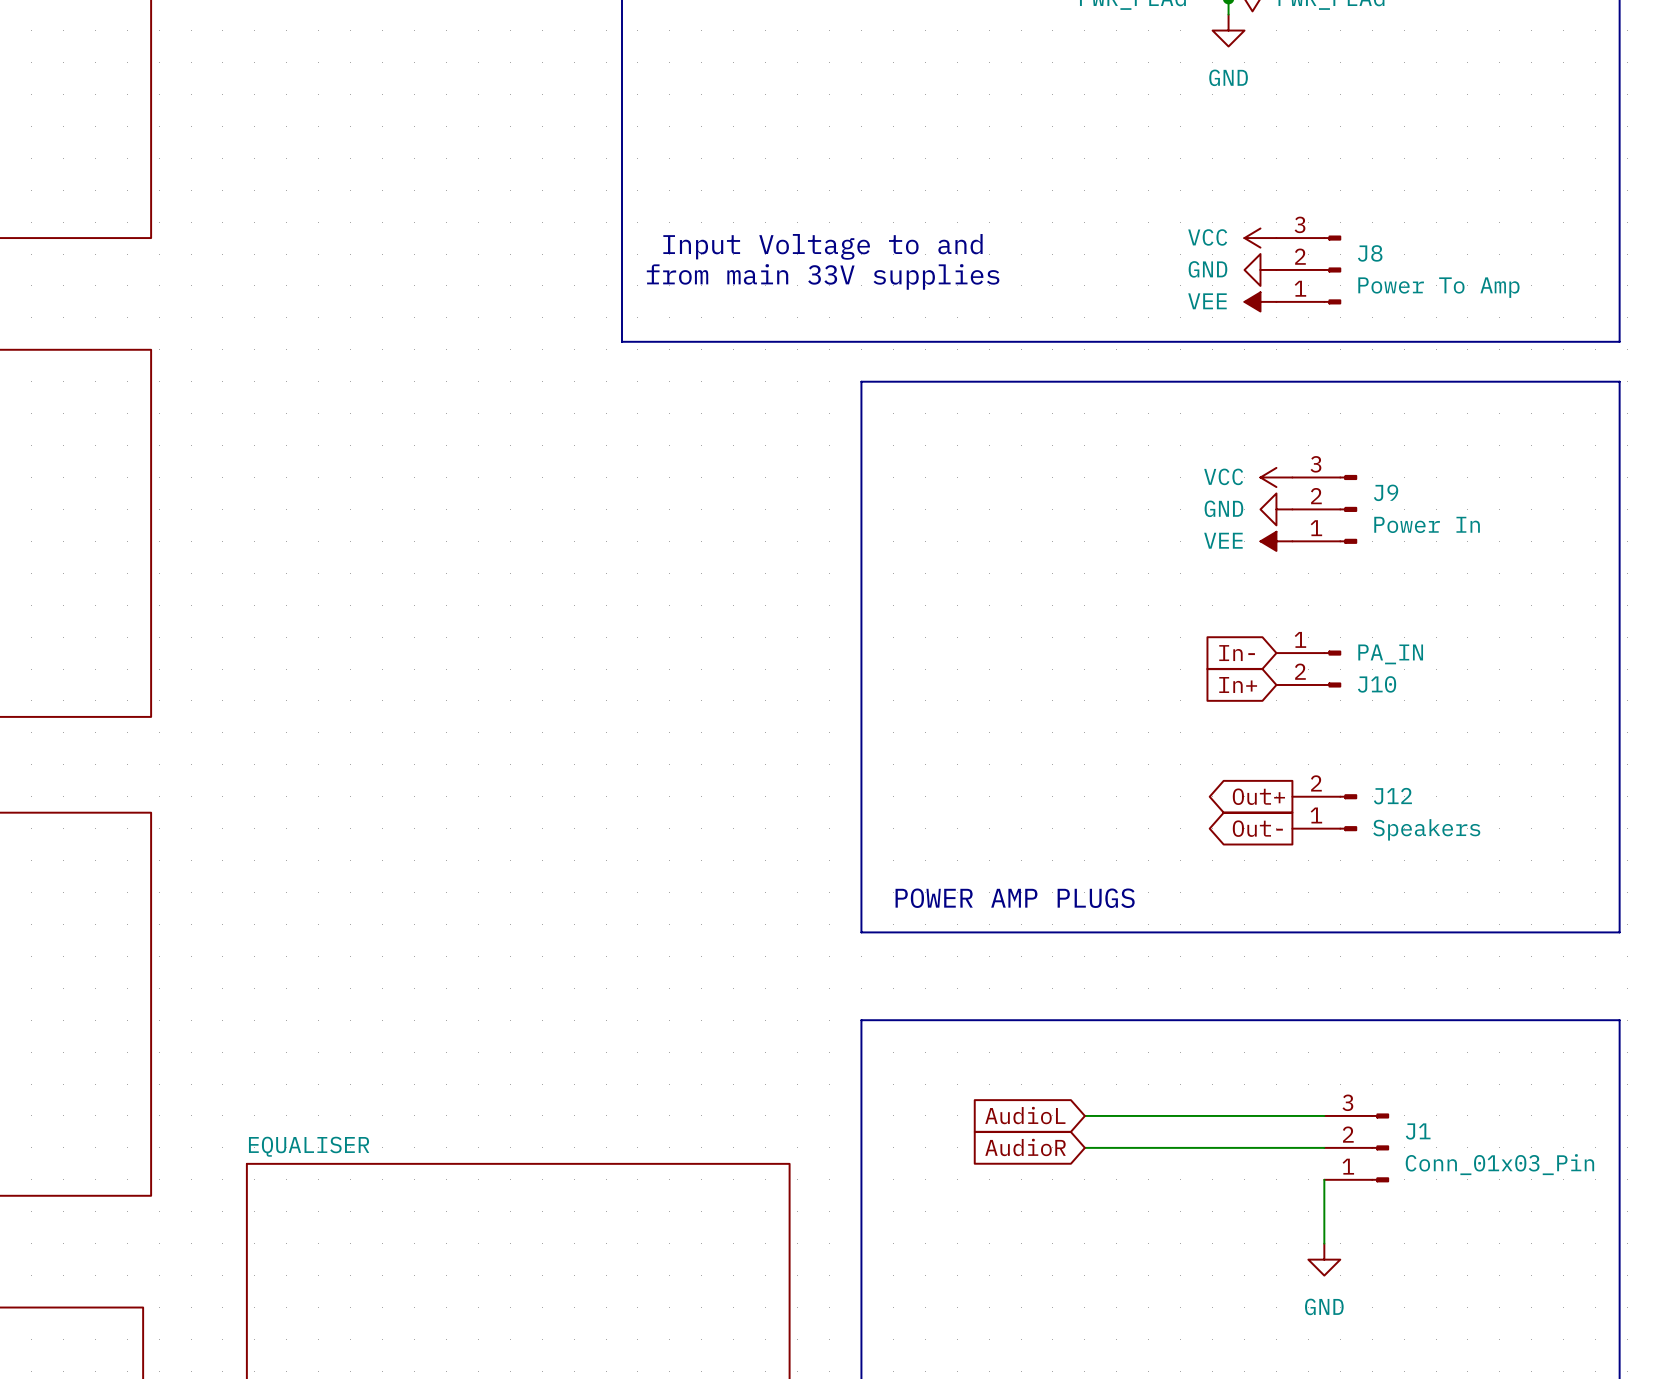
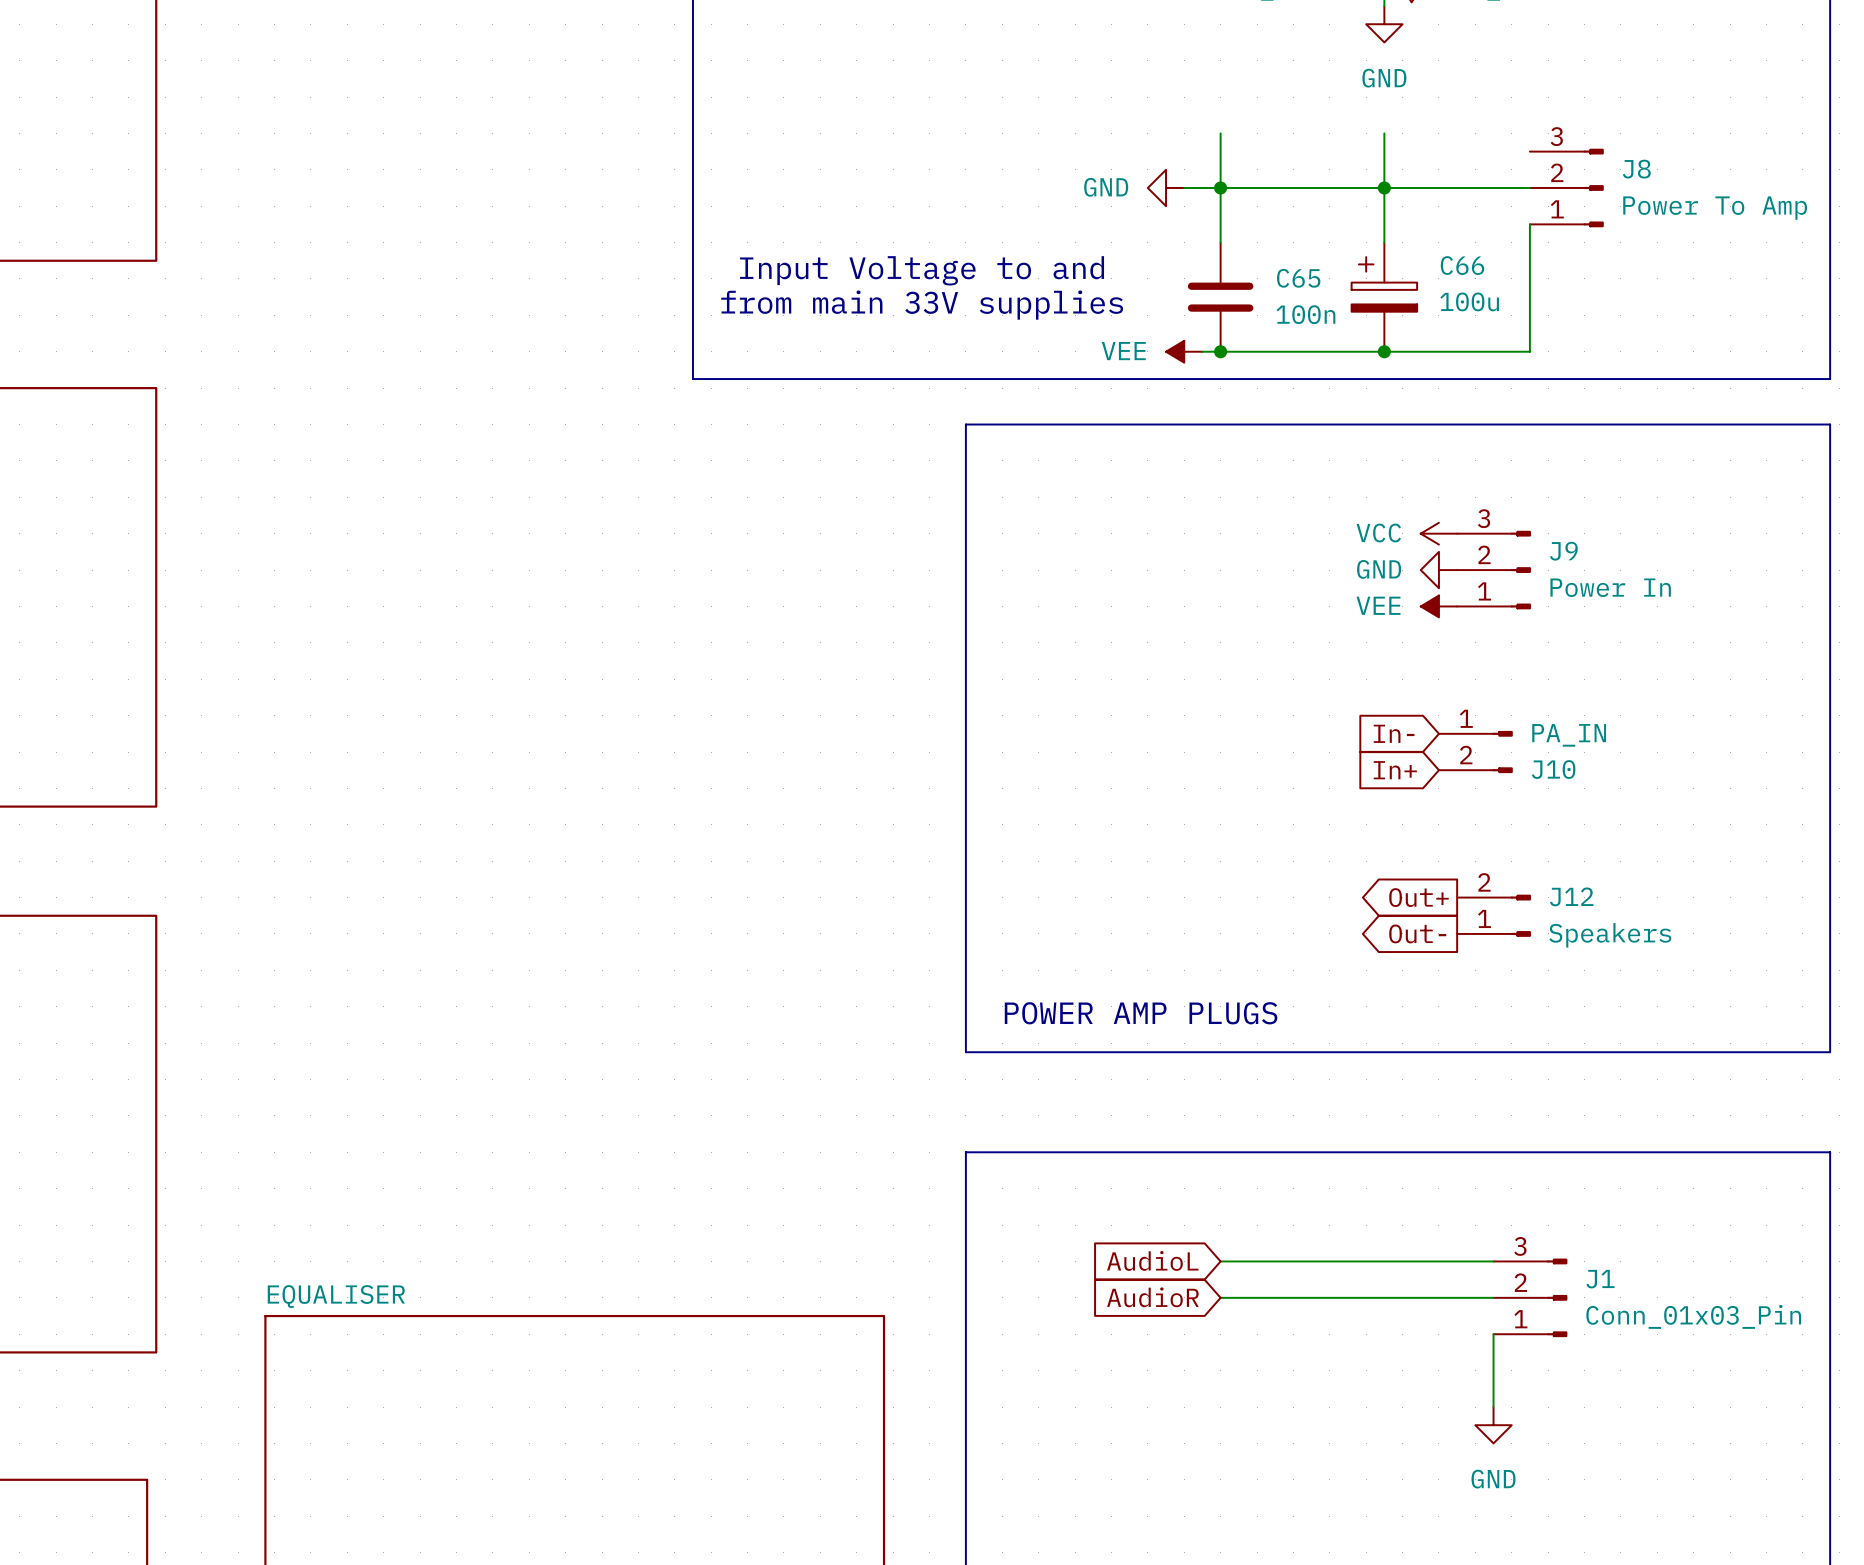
wire: none -> (1220, 133) (1220, 242)
wire: none -> (1384, 133) (1384, 242)
wire: none -> (1184, 187) (1529, 187)
junction: none -> (1220, 187)
junction: none -> (1384, 187)
wire: none -> (1529, 224) (1529, 351) (1202, 351)
power symbol: VCC (1260, 238) -> none
C65: none -> 100n (1220, 297)
C66: none -> 100u (1384, 297)
power symbol position: GND (1260, 269) -> GND (1166, 187)
J8 position: (1308, 269) -> (1566, 187)
power symbol: VEE (1260, 301) -> none
power symbol: none -> VEE (1184, 351)
junction: none -> (1220, 351)
junction: none -> (1384, 351)

